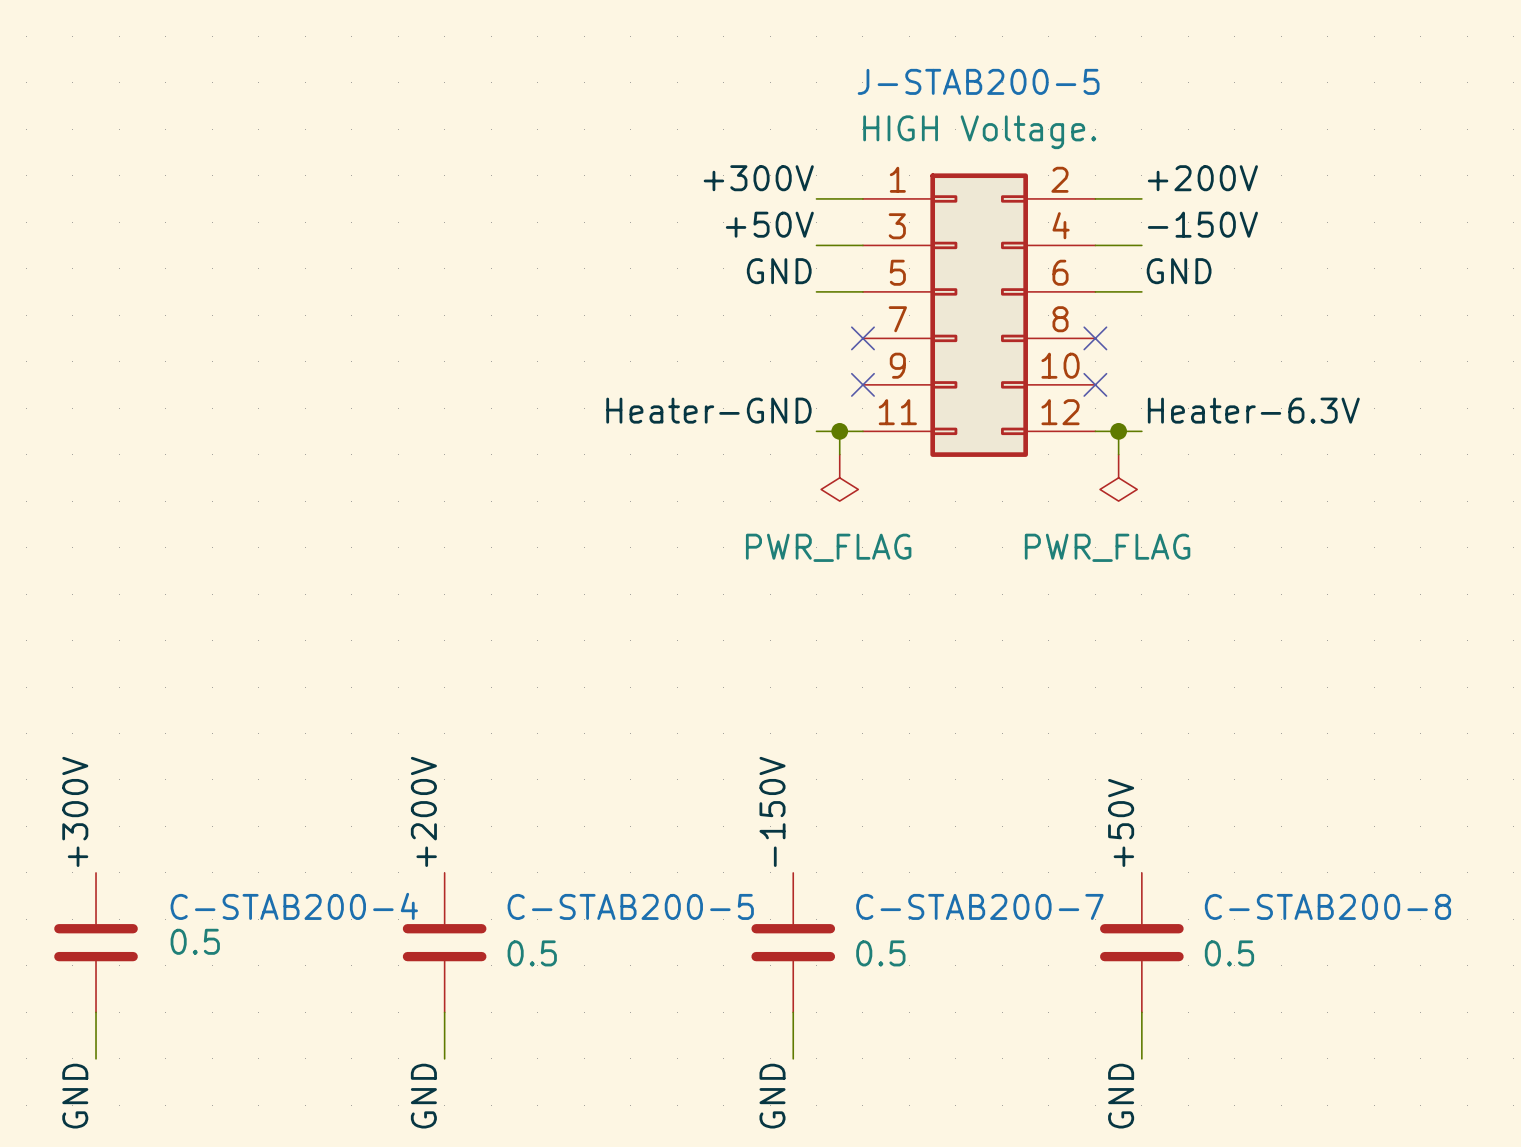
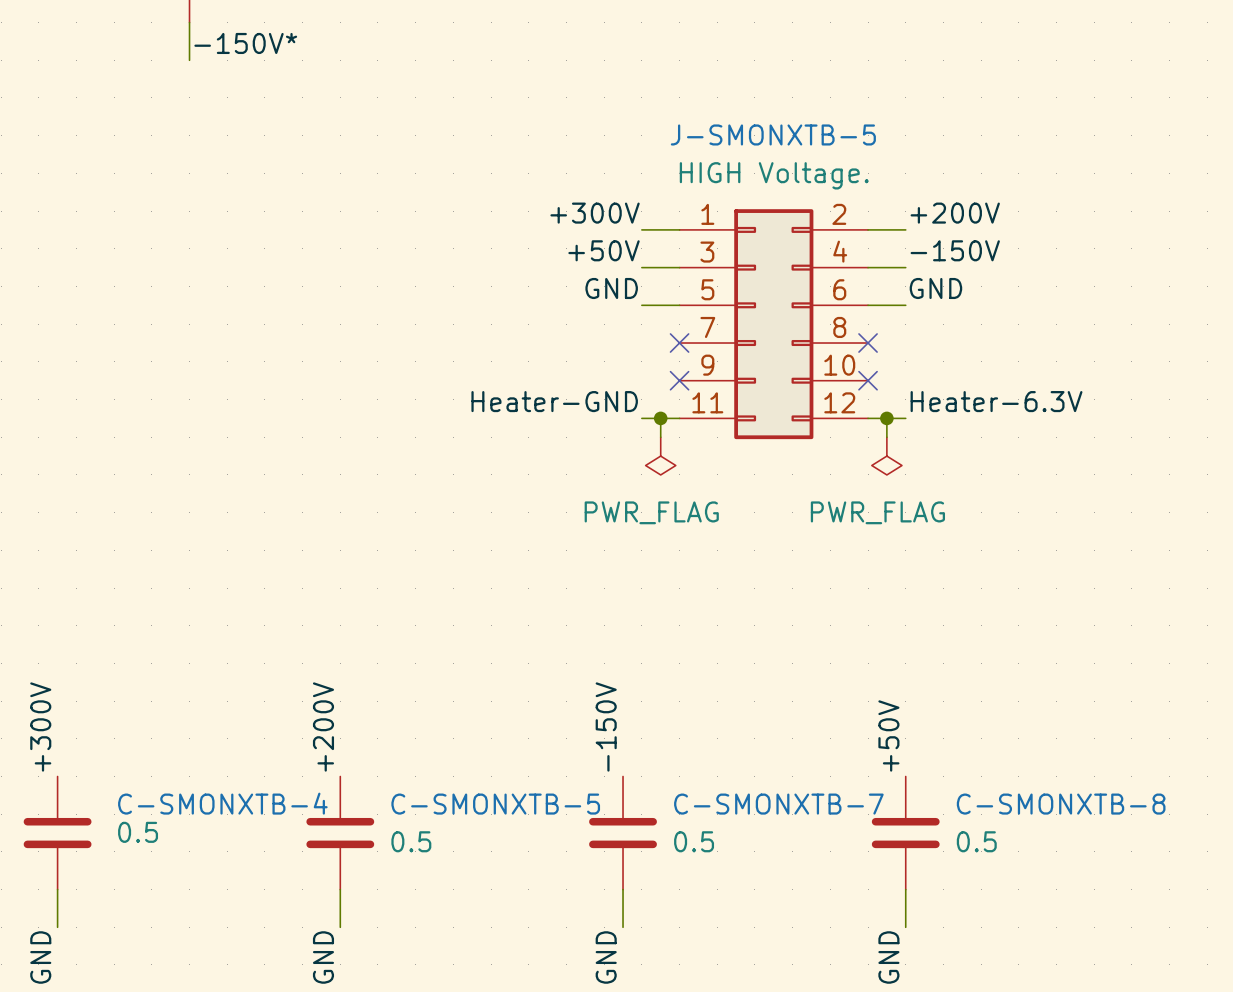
J-STAB200-5 name: J-STAB200-5 (978, 81) -> J-SMONXTB-5 (773, 134)
C-STAB200-4 name: C-STAB200-4 (294, 906) -> C-SMONXTB-4 (222, 803)
C-STAB200-5 name: C-STAB200-5 (630, 906) -> C-SMONXTB-5 (495, 804)
C-STAB200-7 name: C-STAB200-7 (979, 906) -> C-SMONXTB-7 (778, 804)
C-STAB200-8 name: C-STAB200-8 (1327, 906) -> C-SMONXTB-8 (1061, 804)

